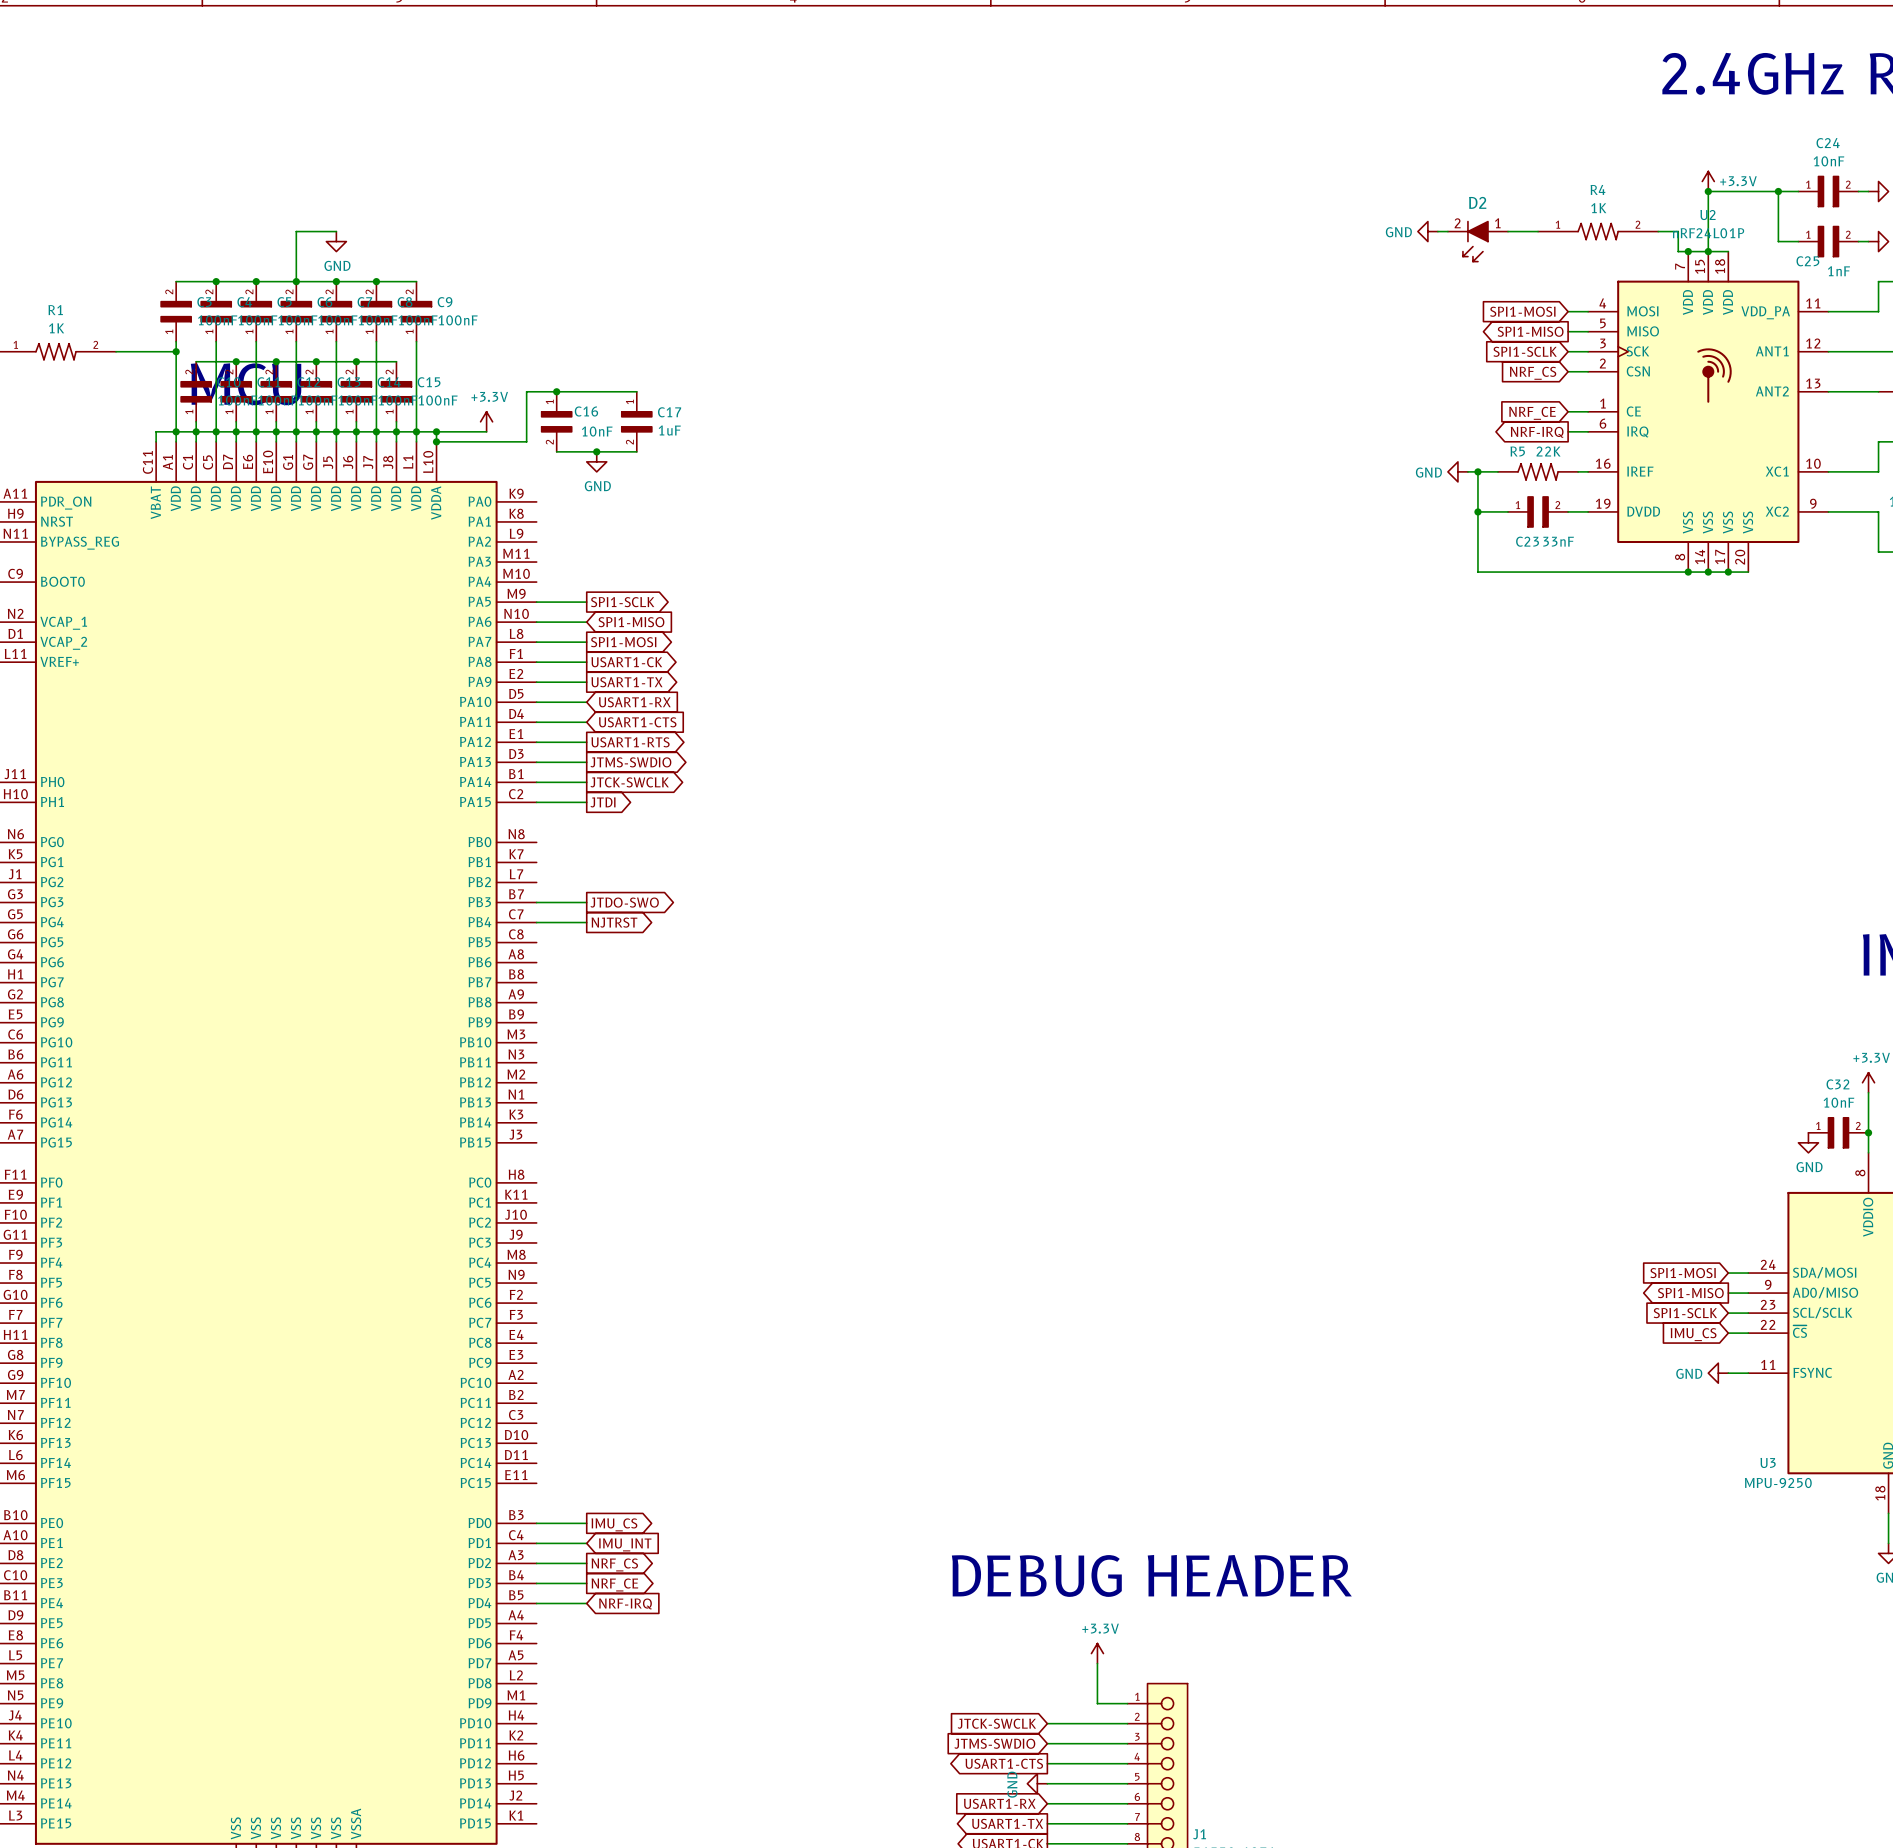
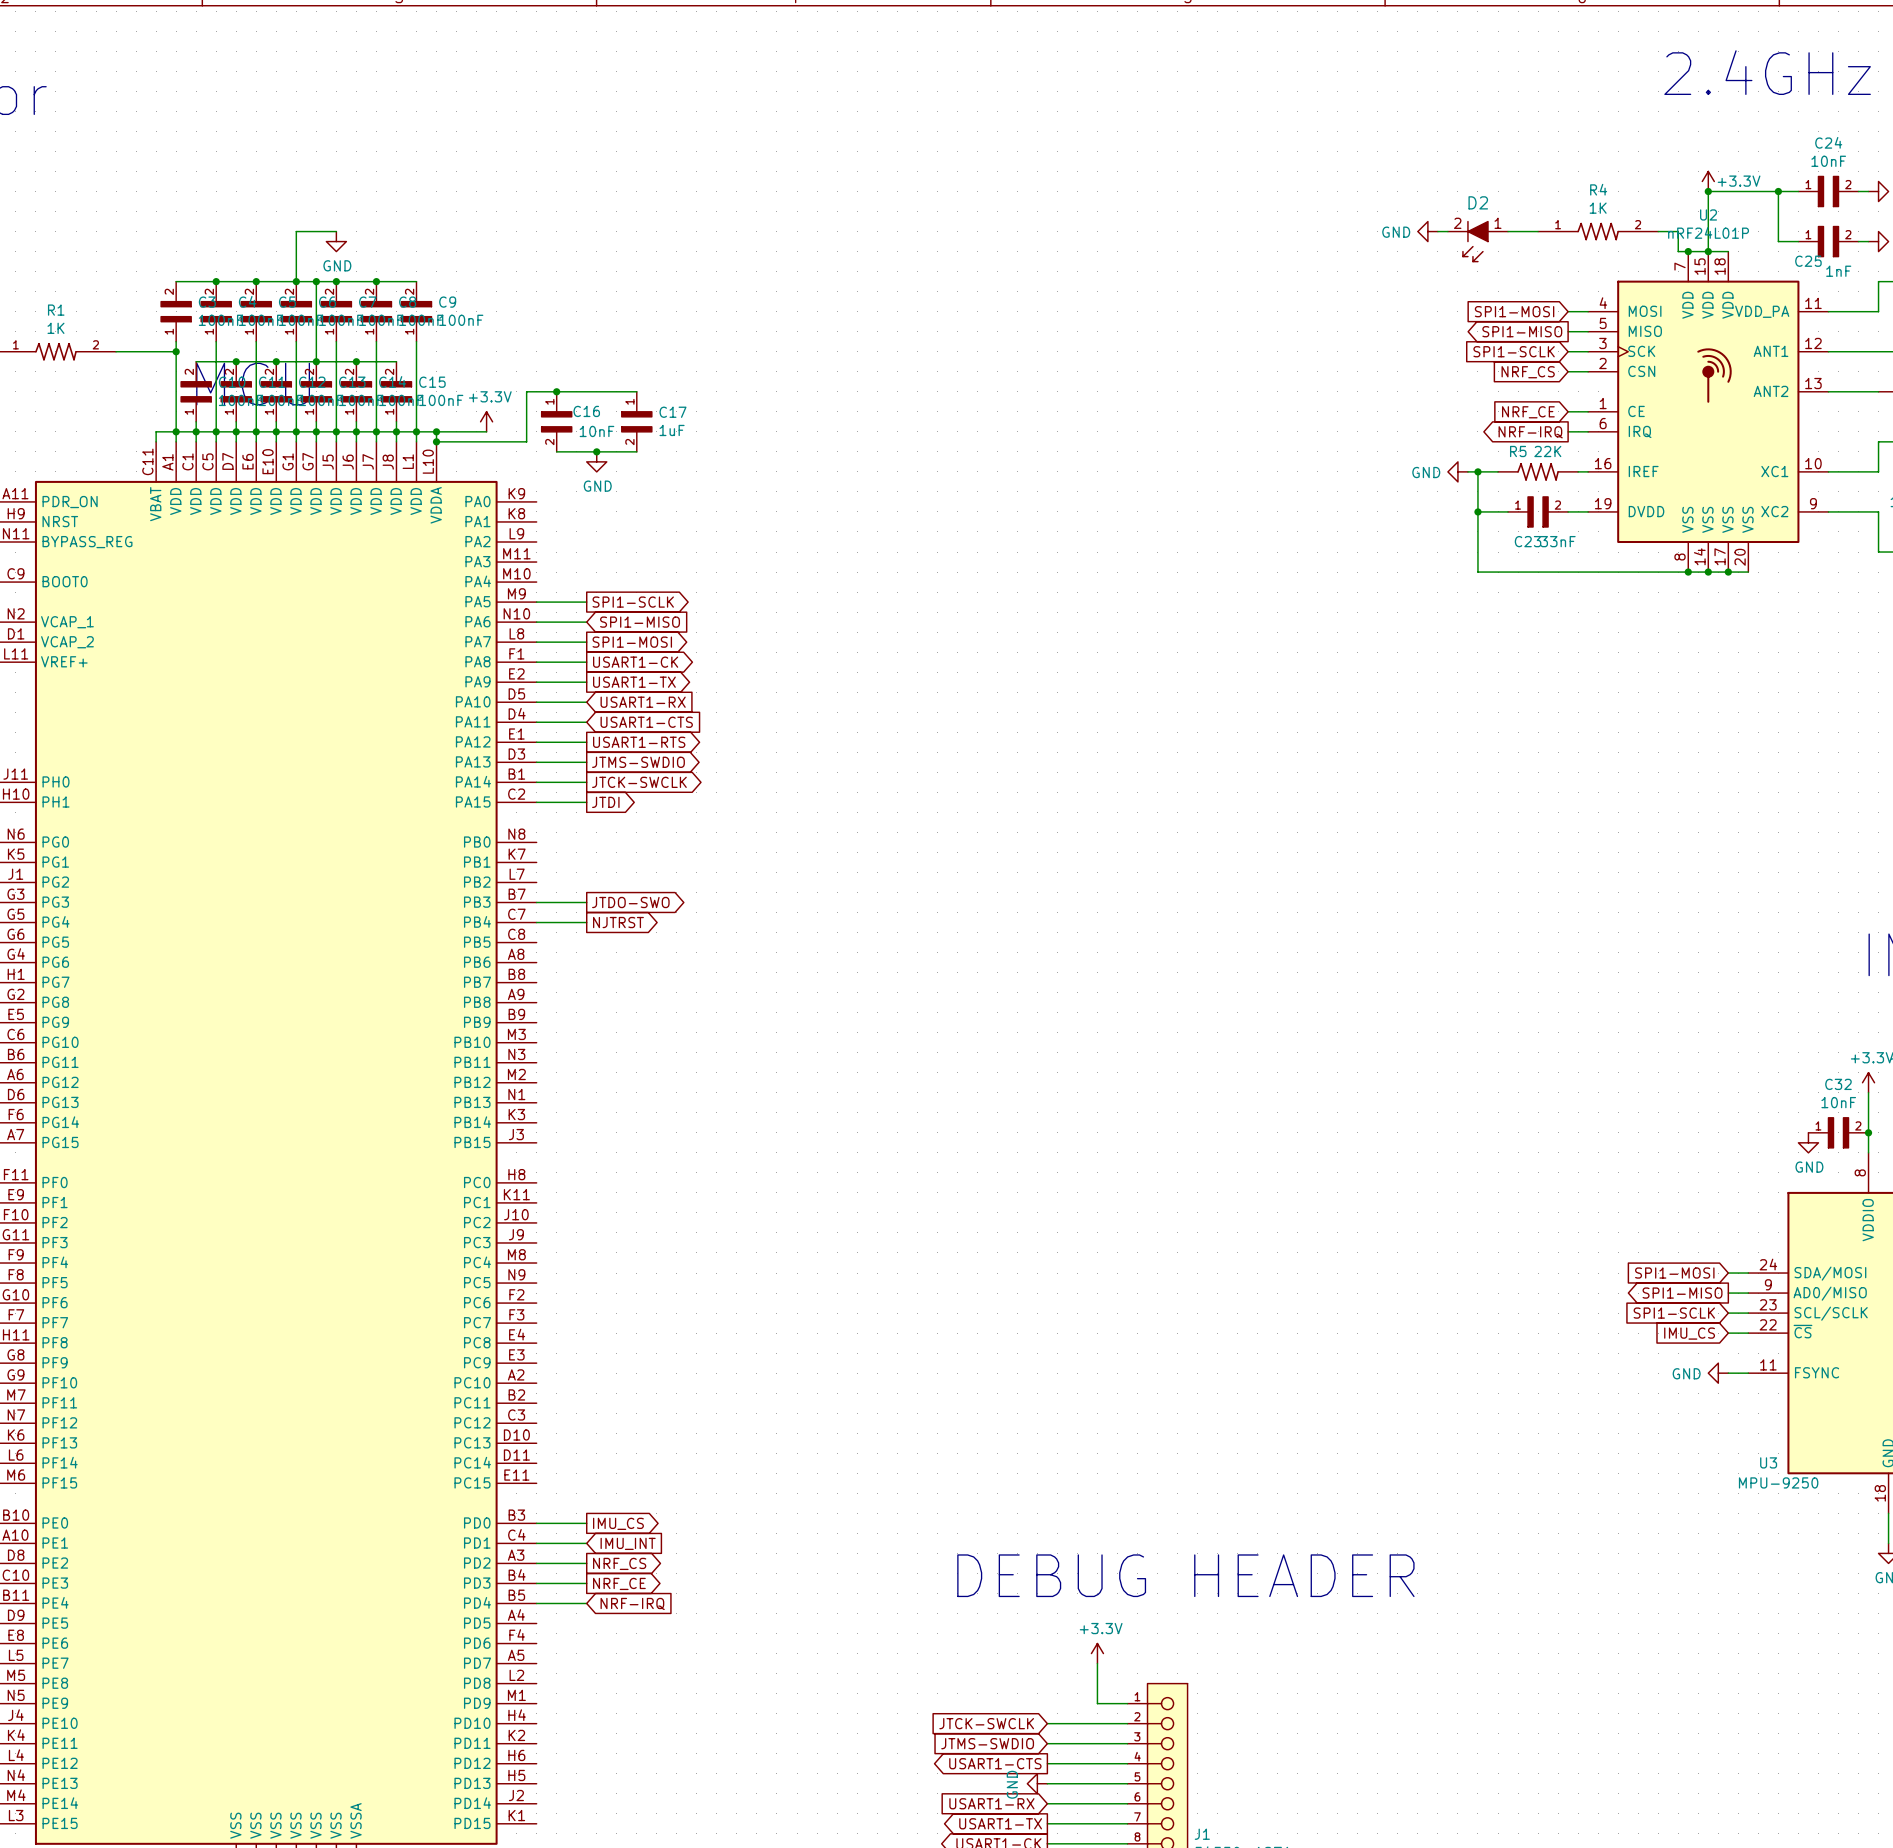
wire: none -> (316, 281) (316, 361)
junction: none -> (316, 281)

